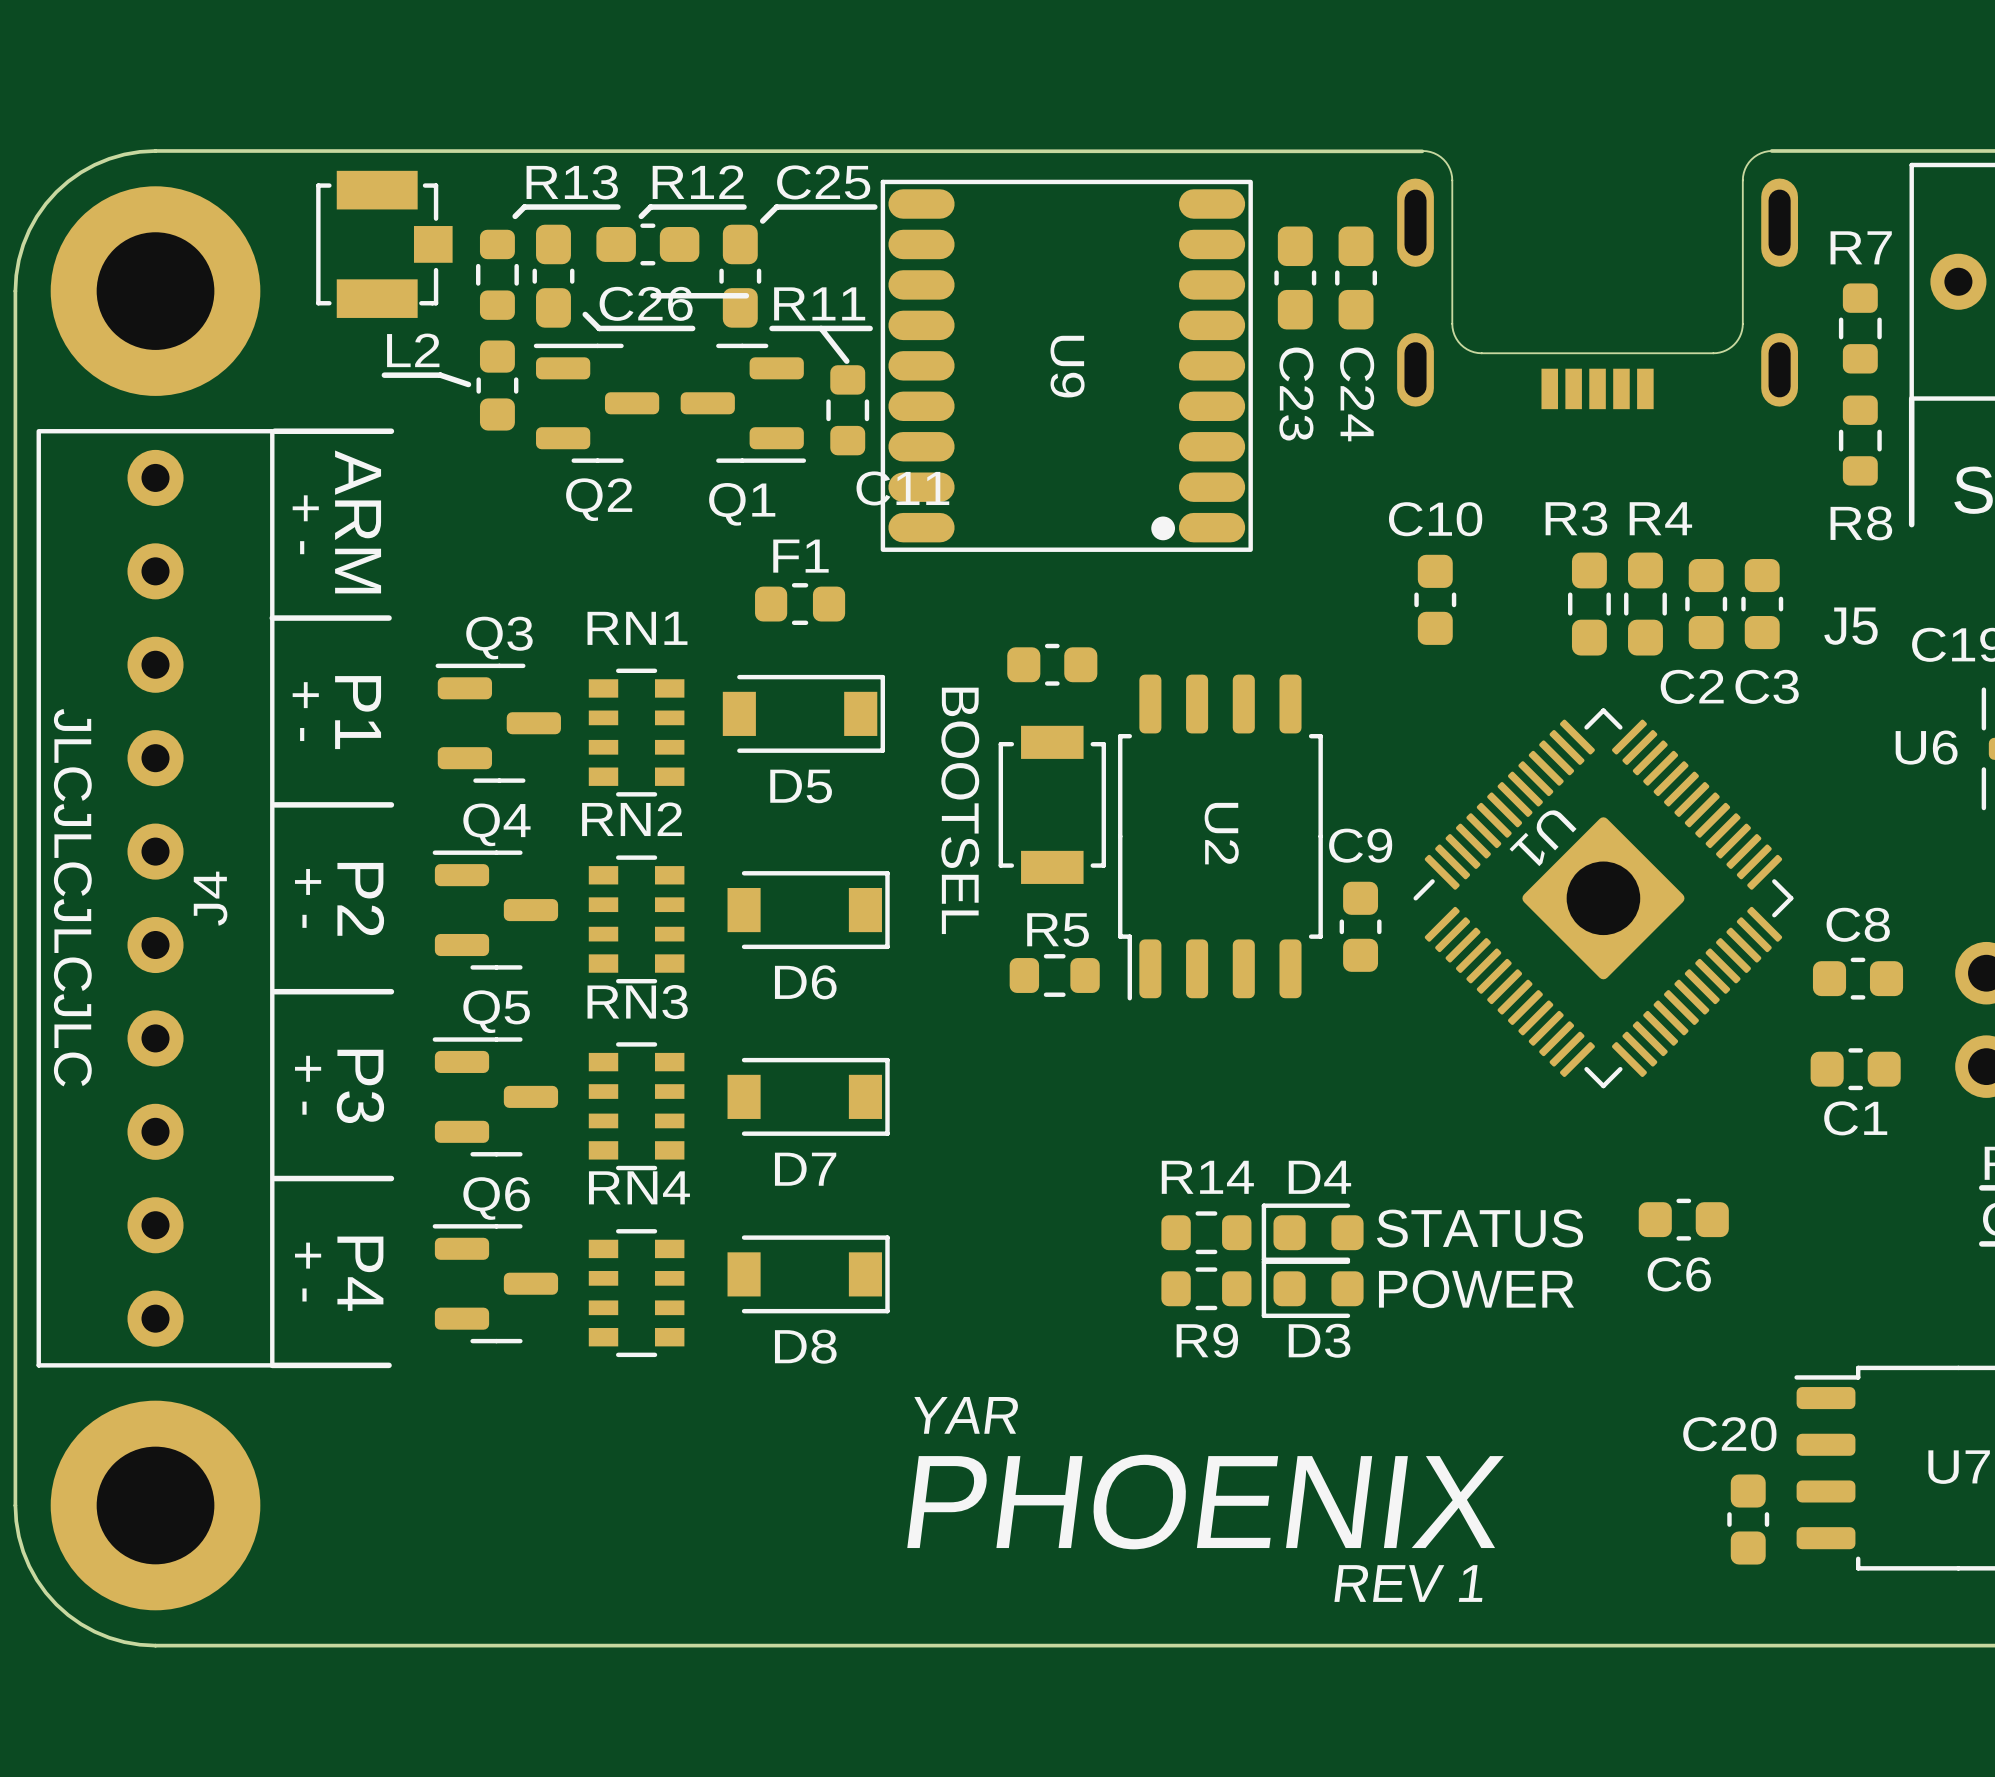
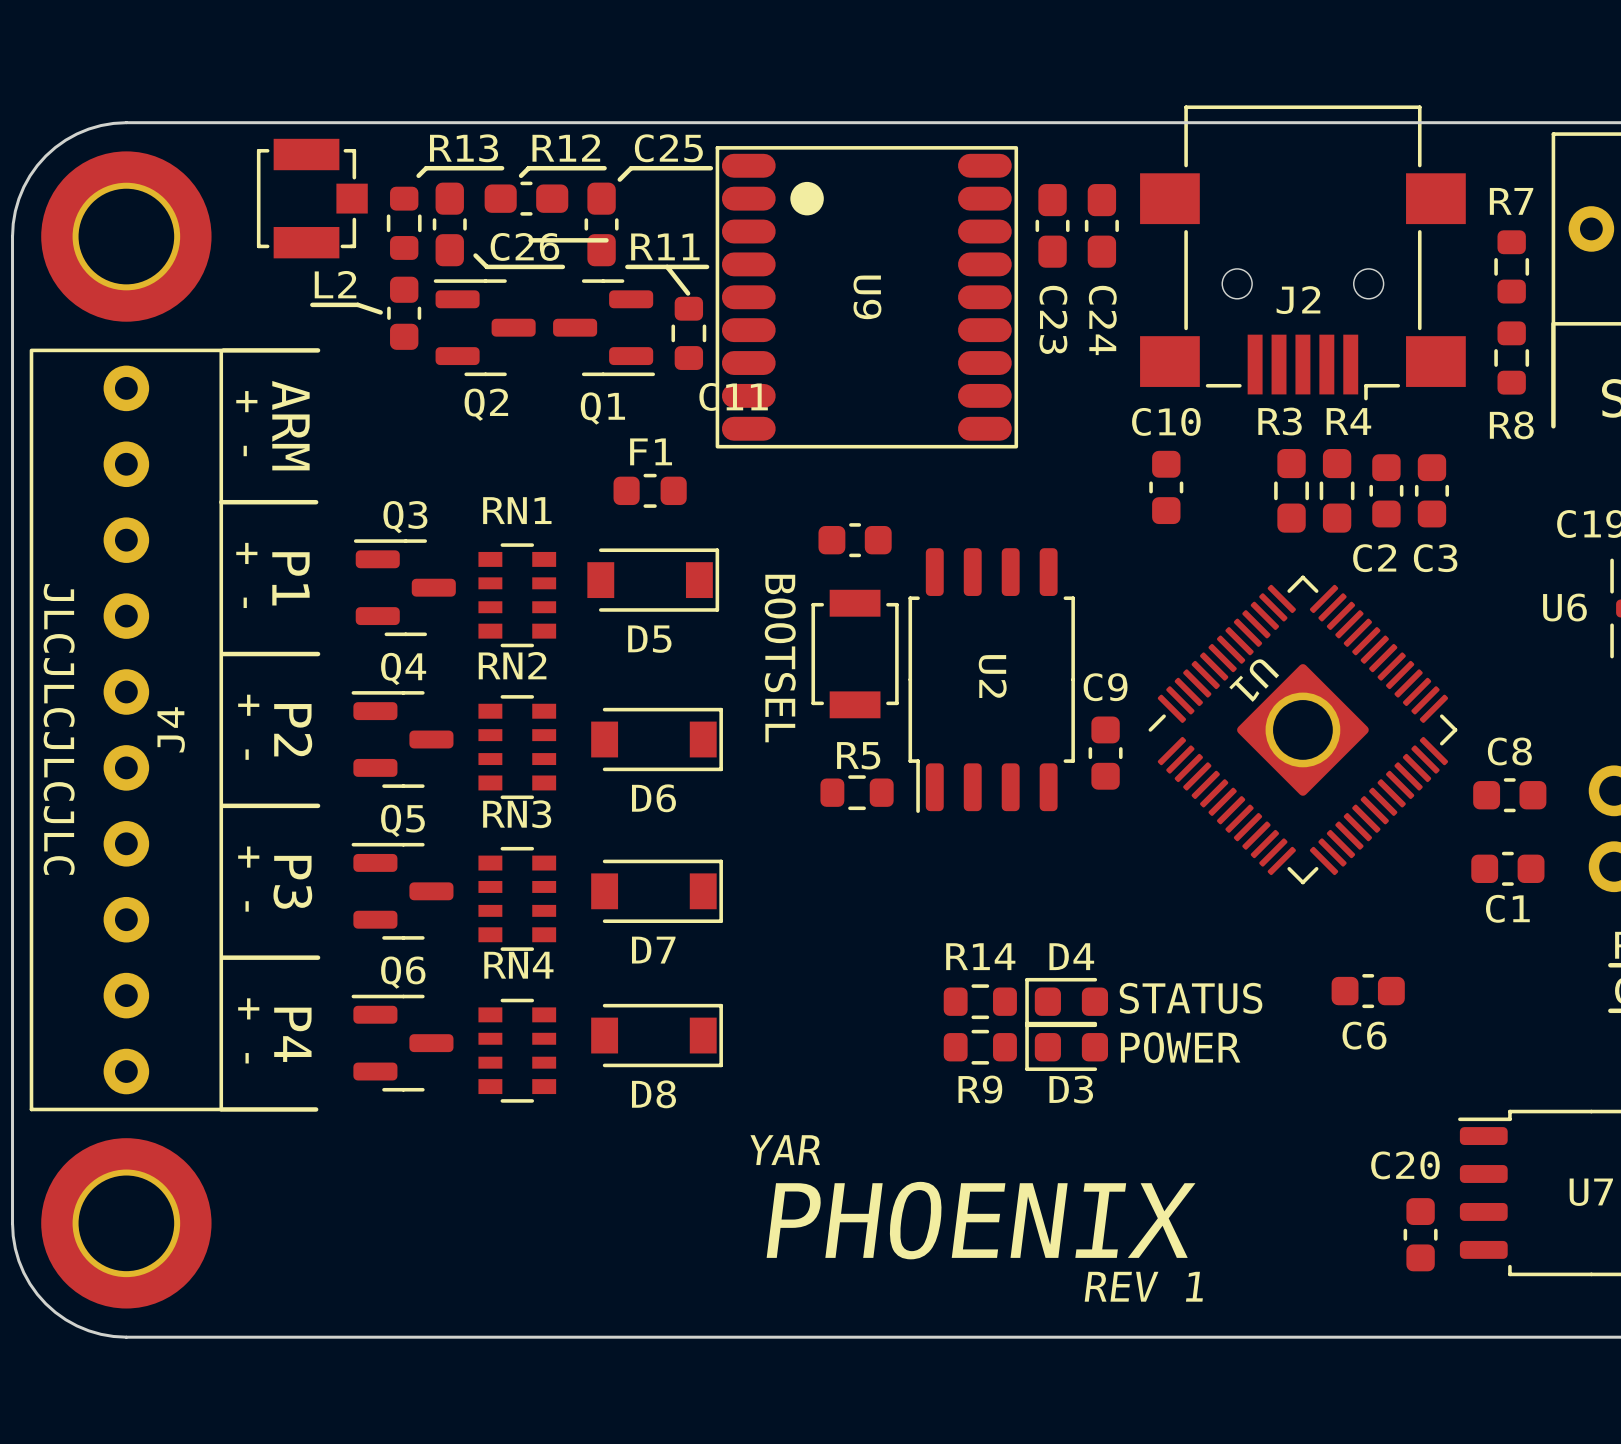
board edge: (155, 150) (1422, 151) -> (126, 122) (1439, 122)
U9 footprint: [880, 179, 1253, 552] -> [715, 146, 1019, 449]
J5: (1597, 279) -> none
J2: none -> (1302, 252)

